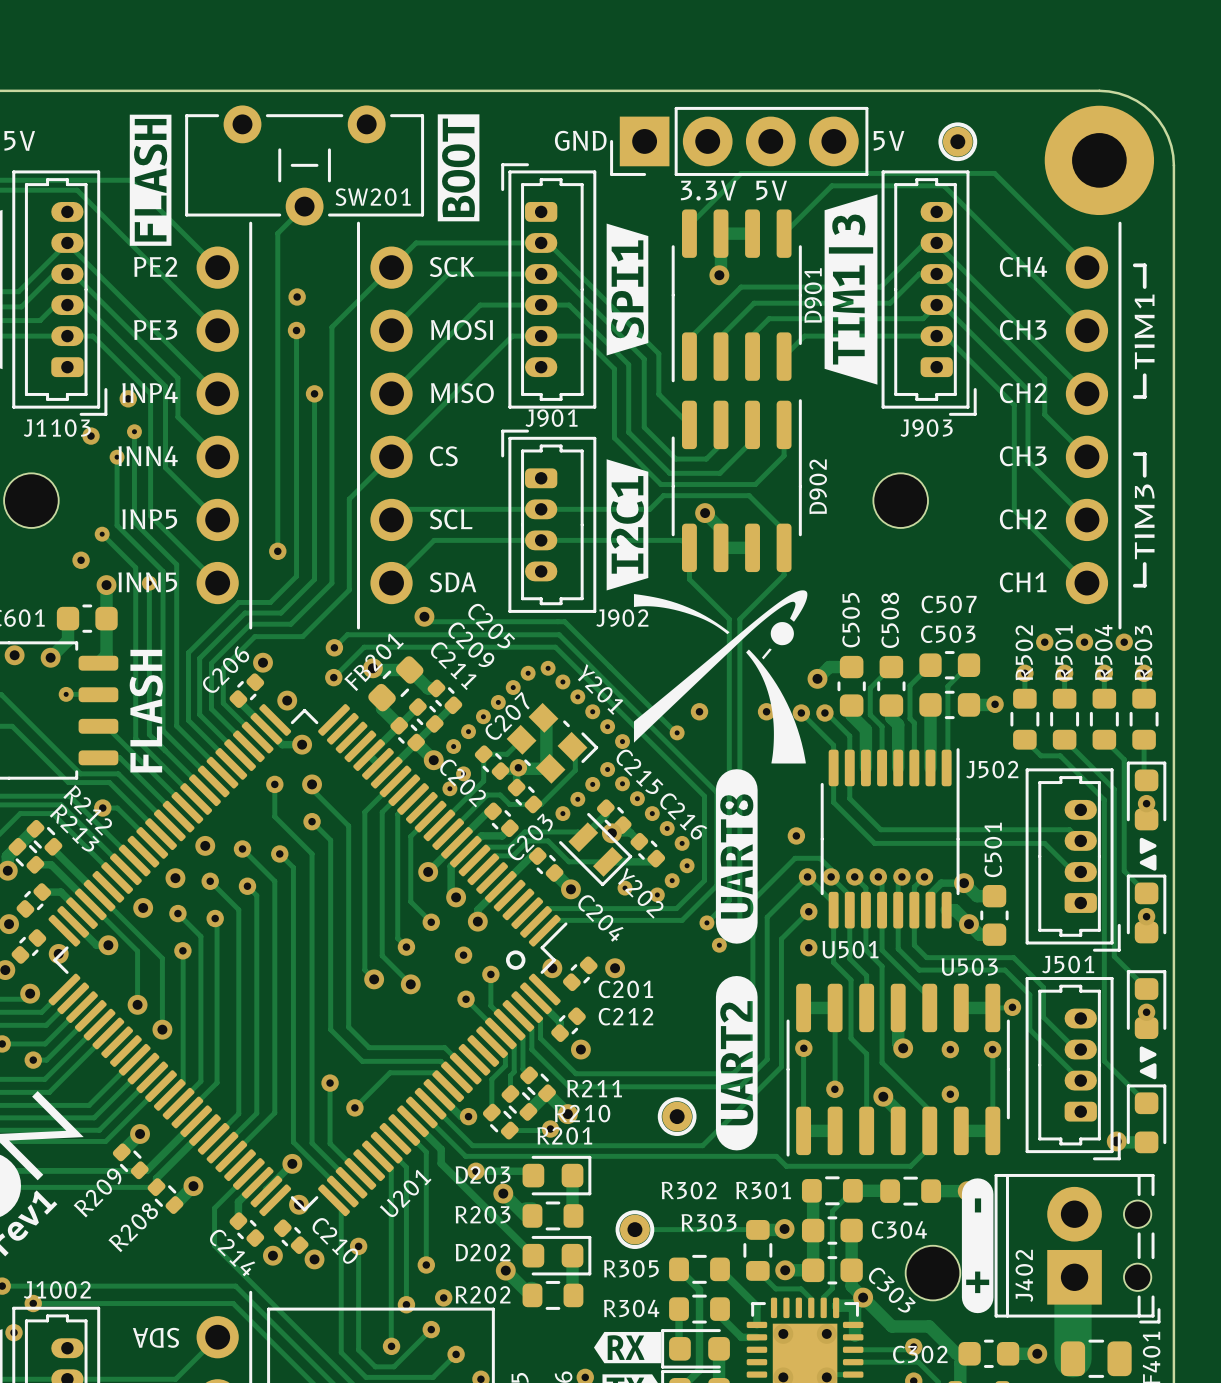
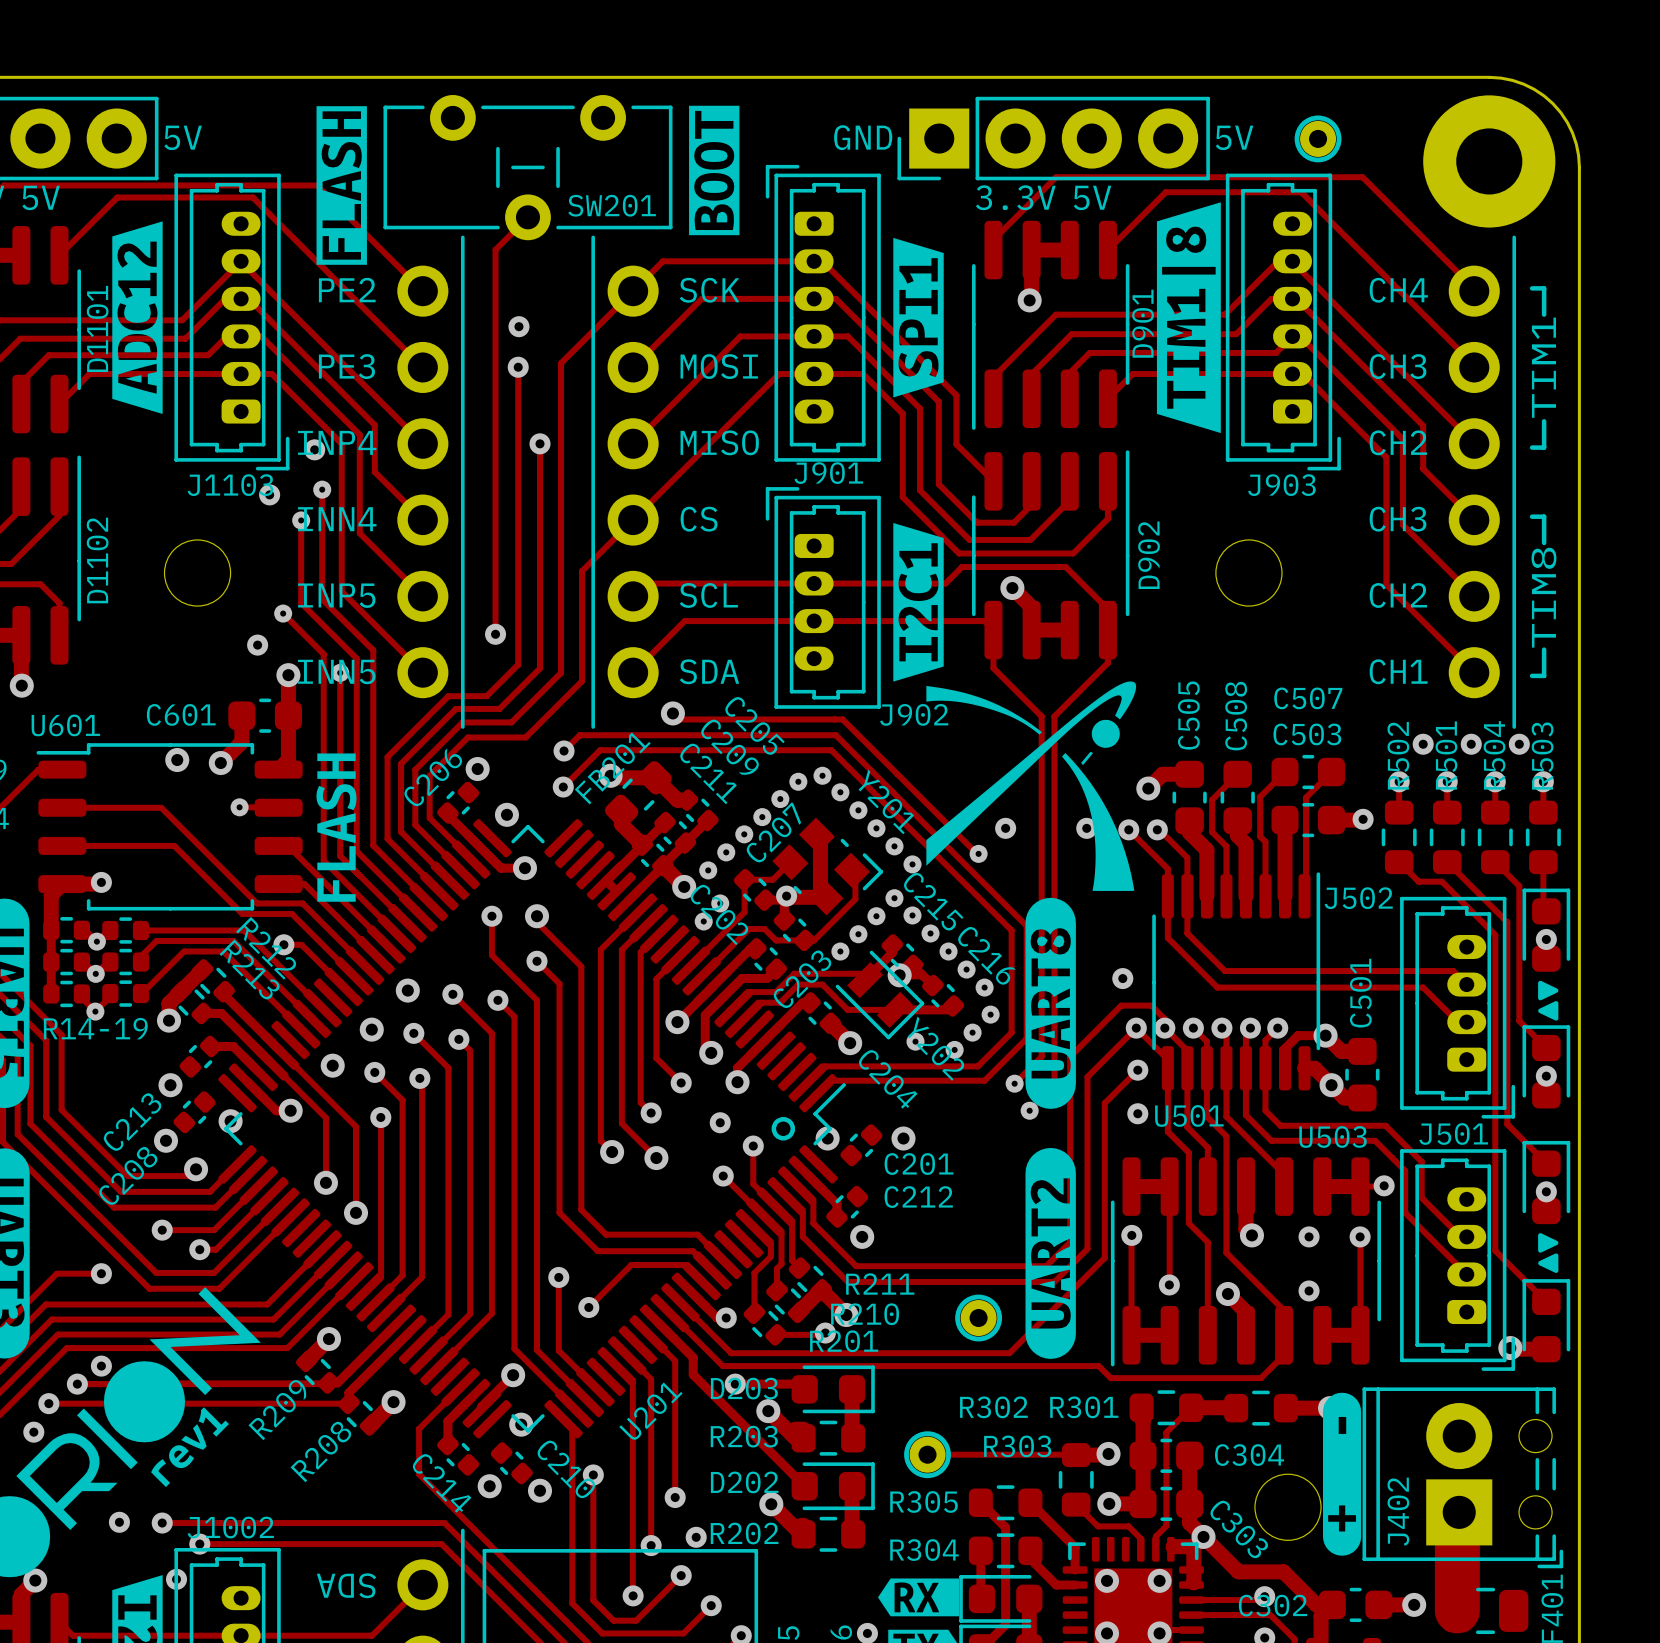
drawing shape: [824, 194, 878, 385] -> [1156, 202, 1221, 434]
text: TIM3 (1144, 521) -> TIM8 (1543, 597)

